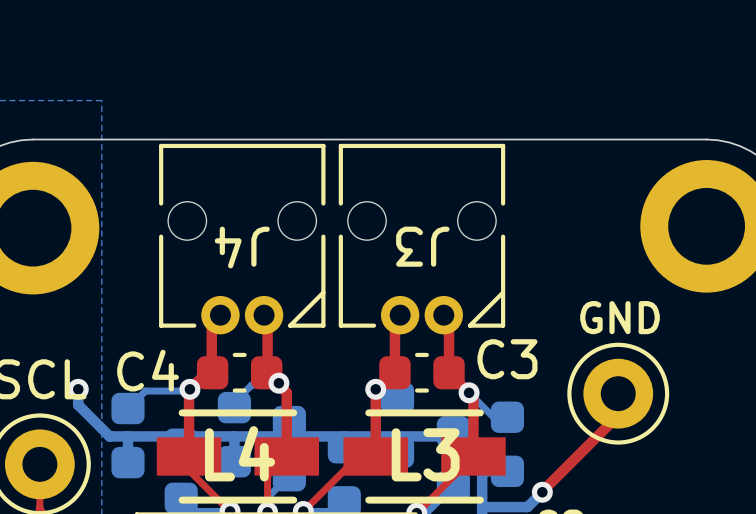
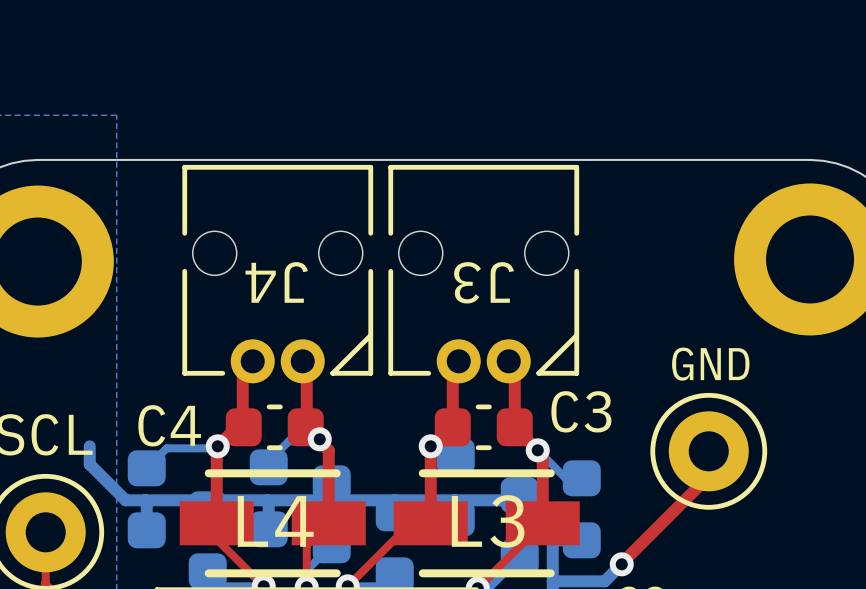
via: (78, 389) -> none

